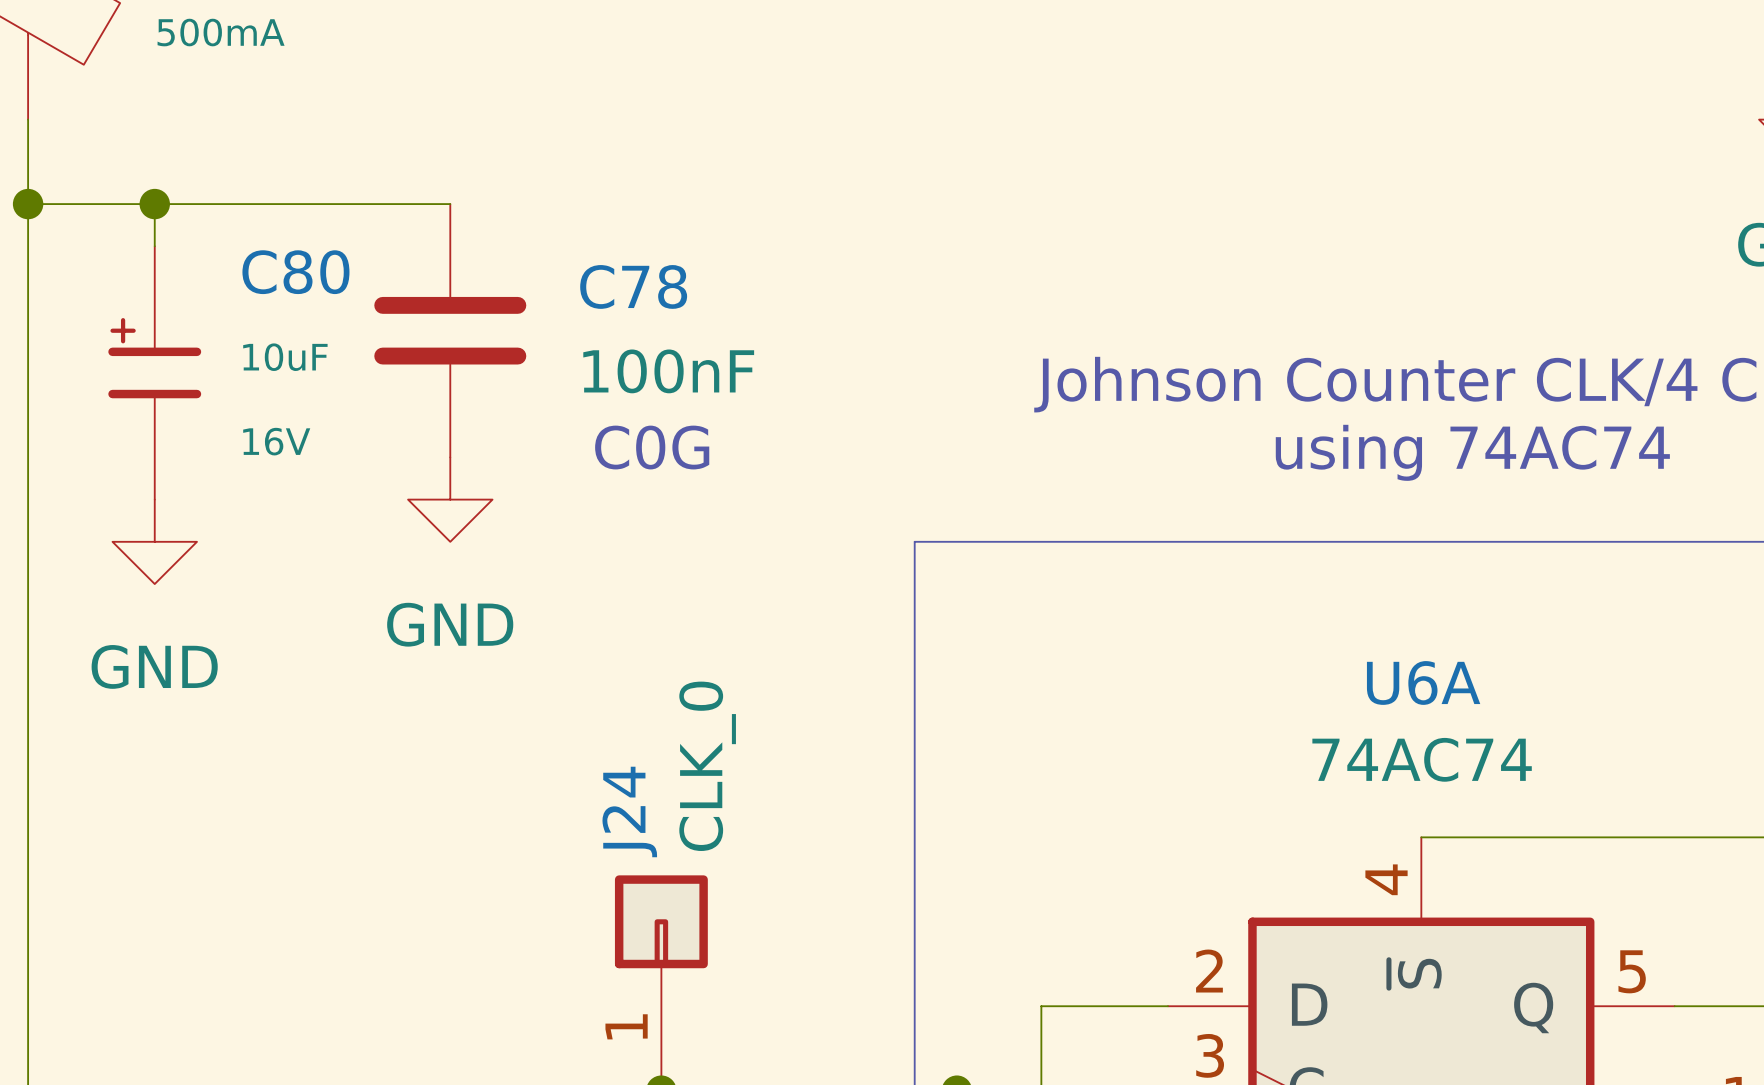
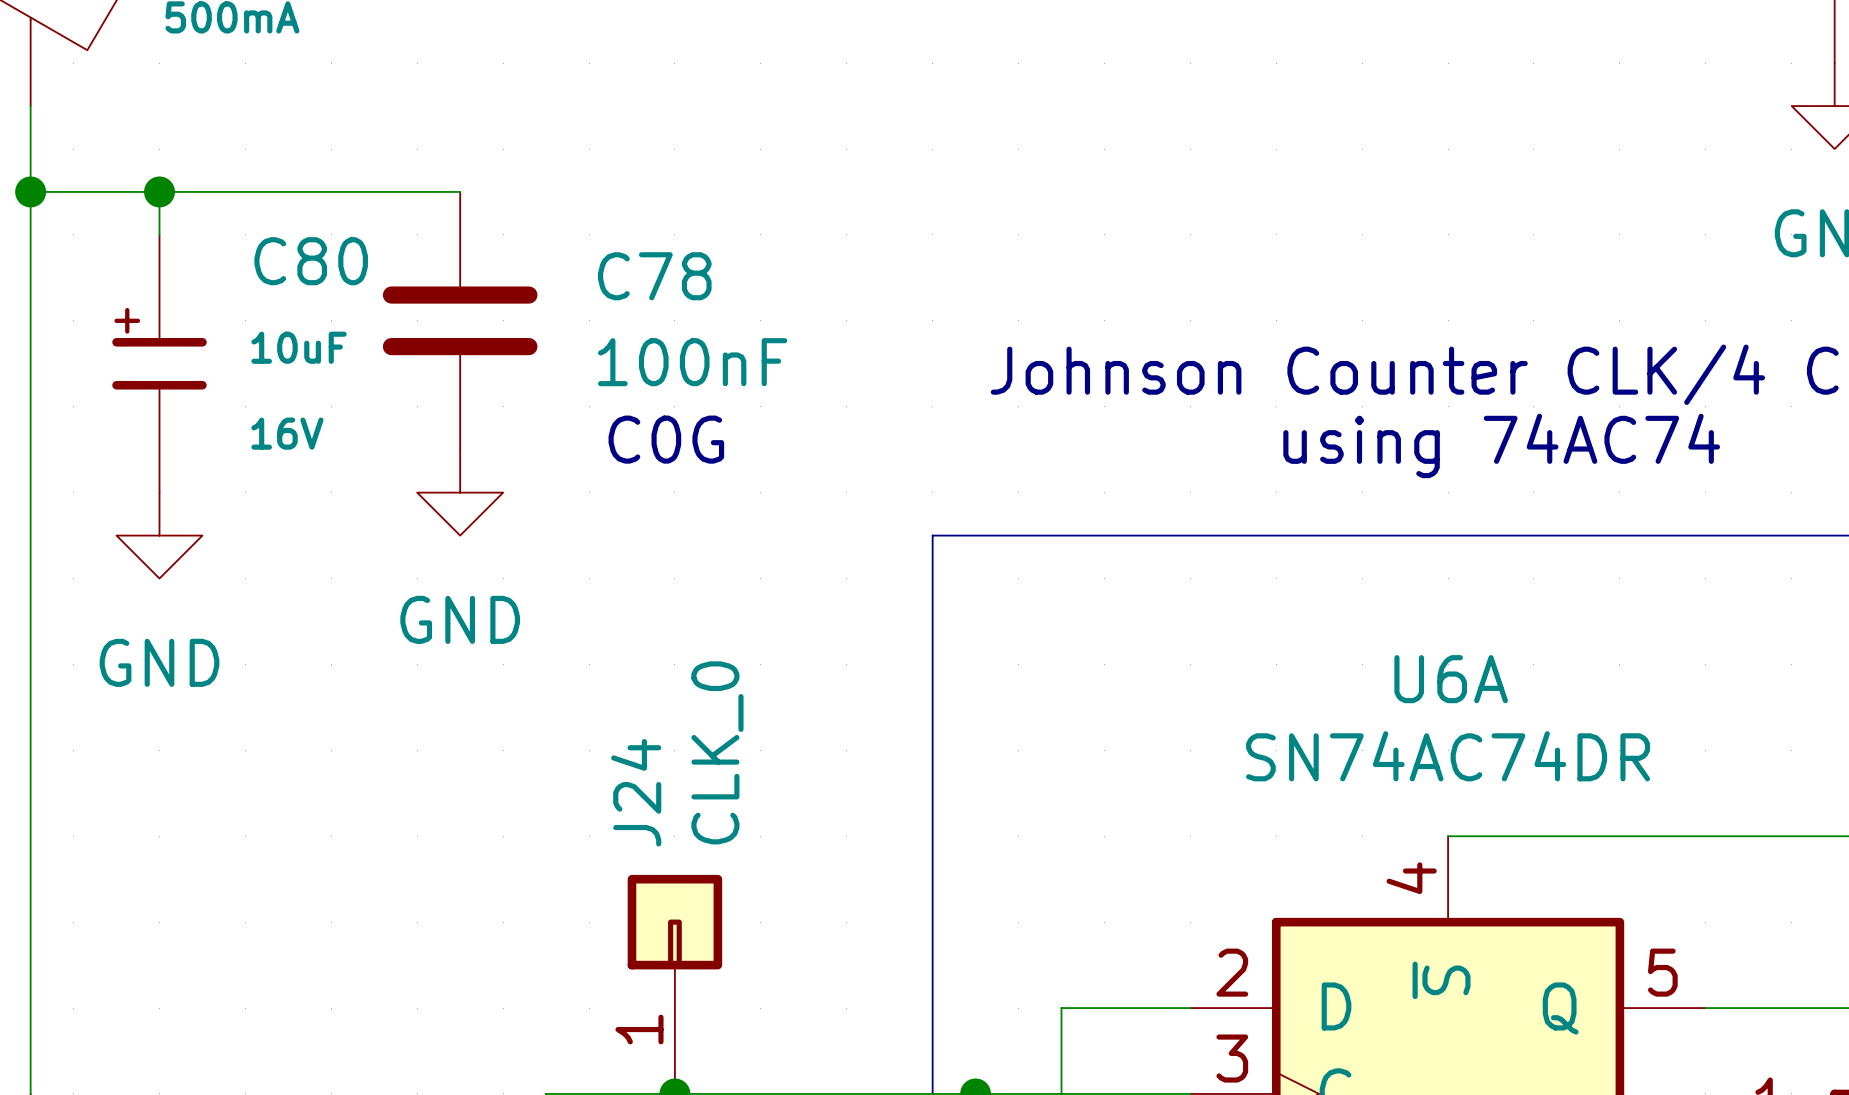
U6A value: 74AC74 (1422, 759) -> SN74AC74DR (1448, 756)

